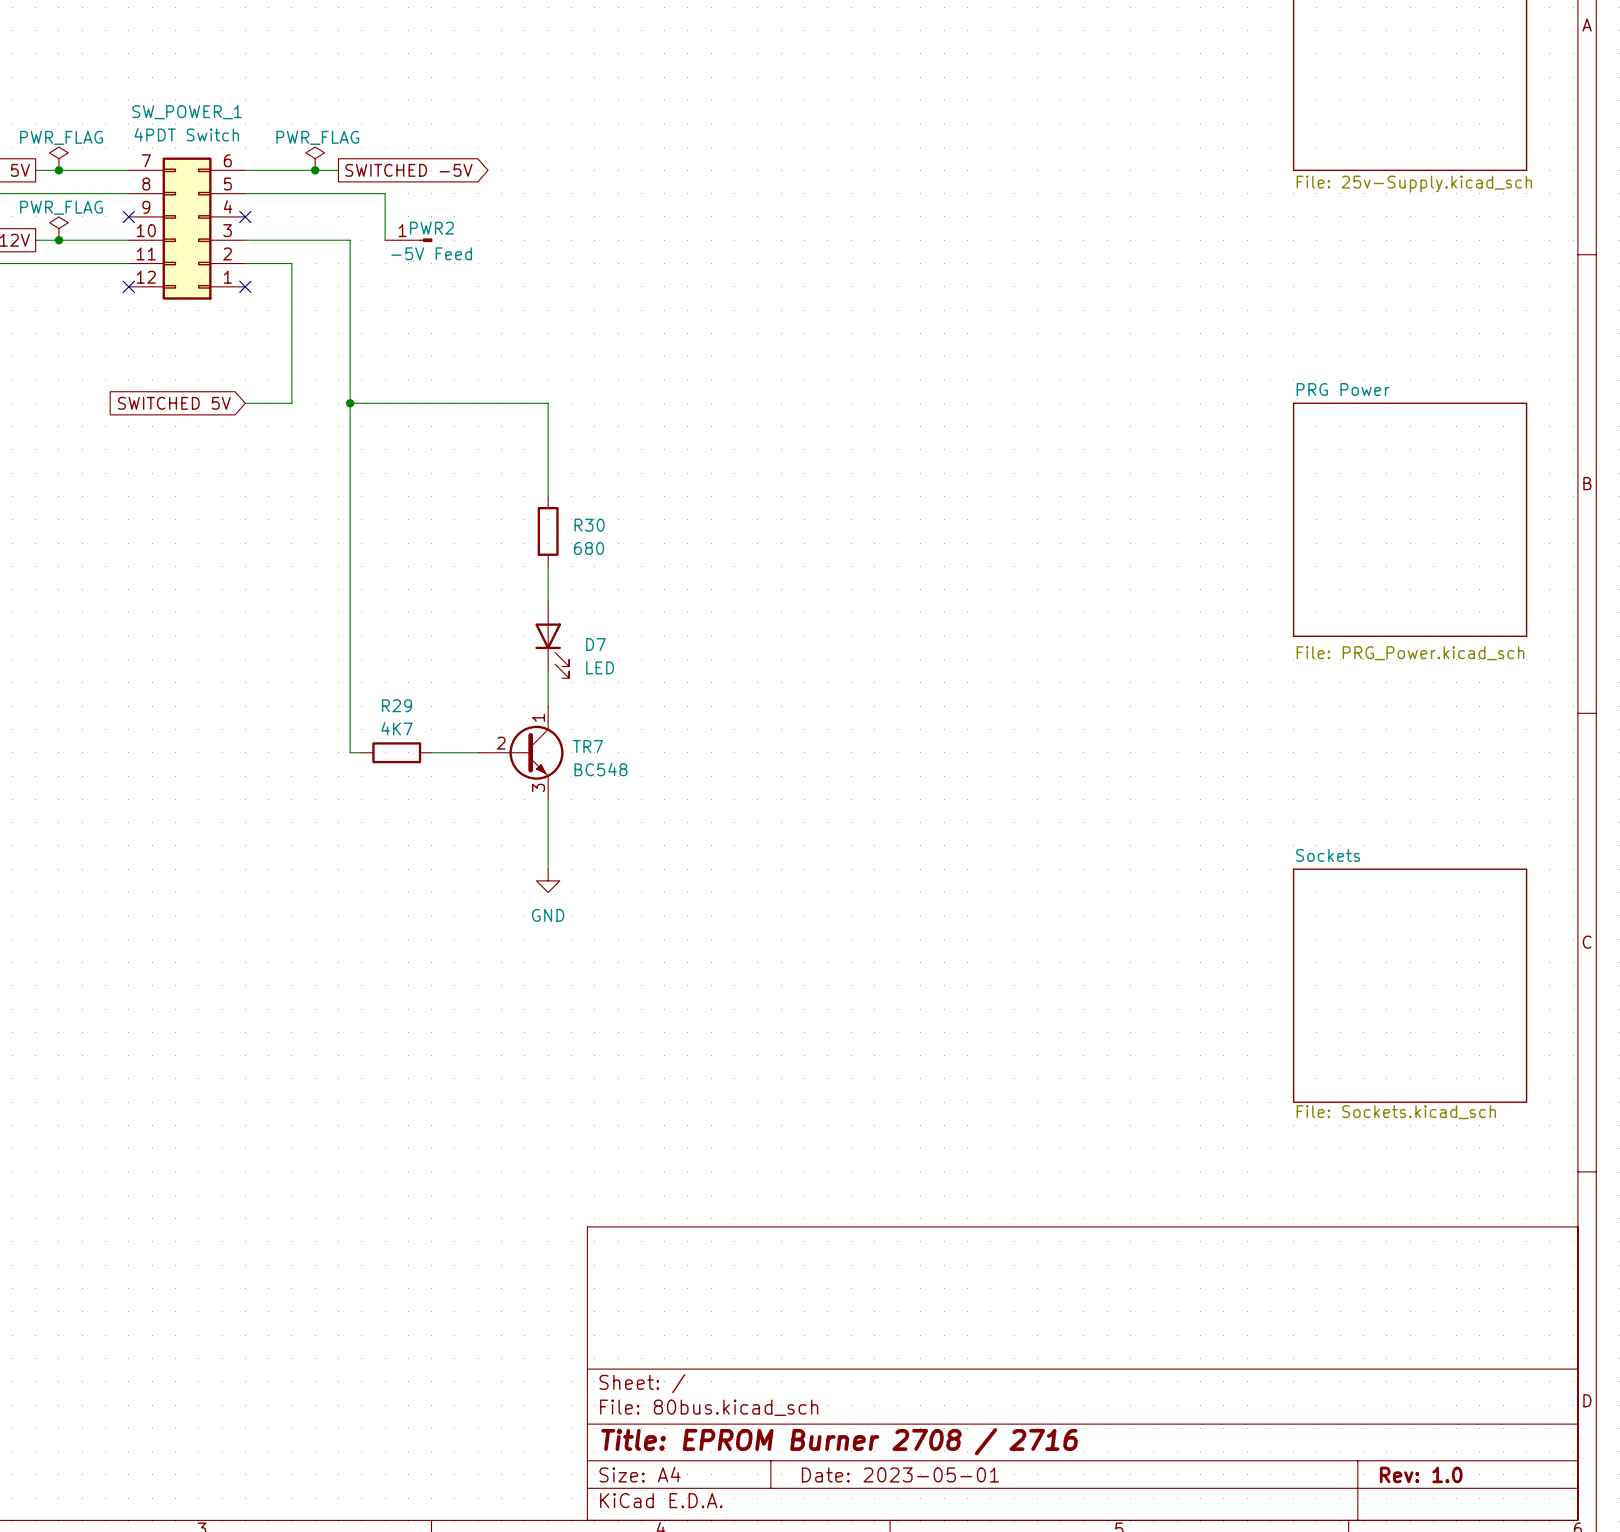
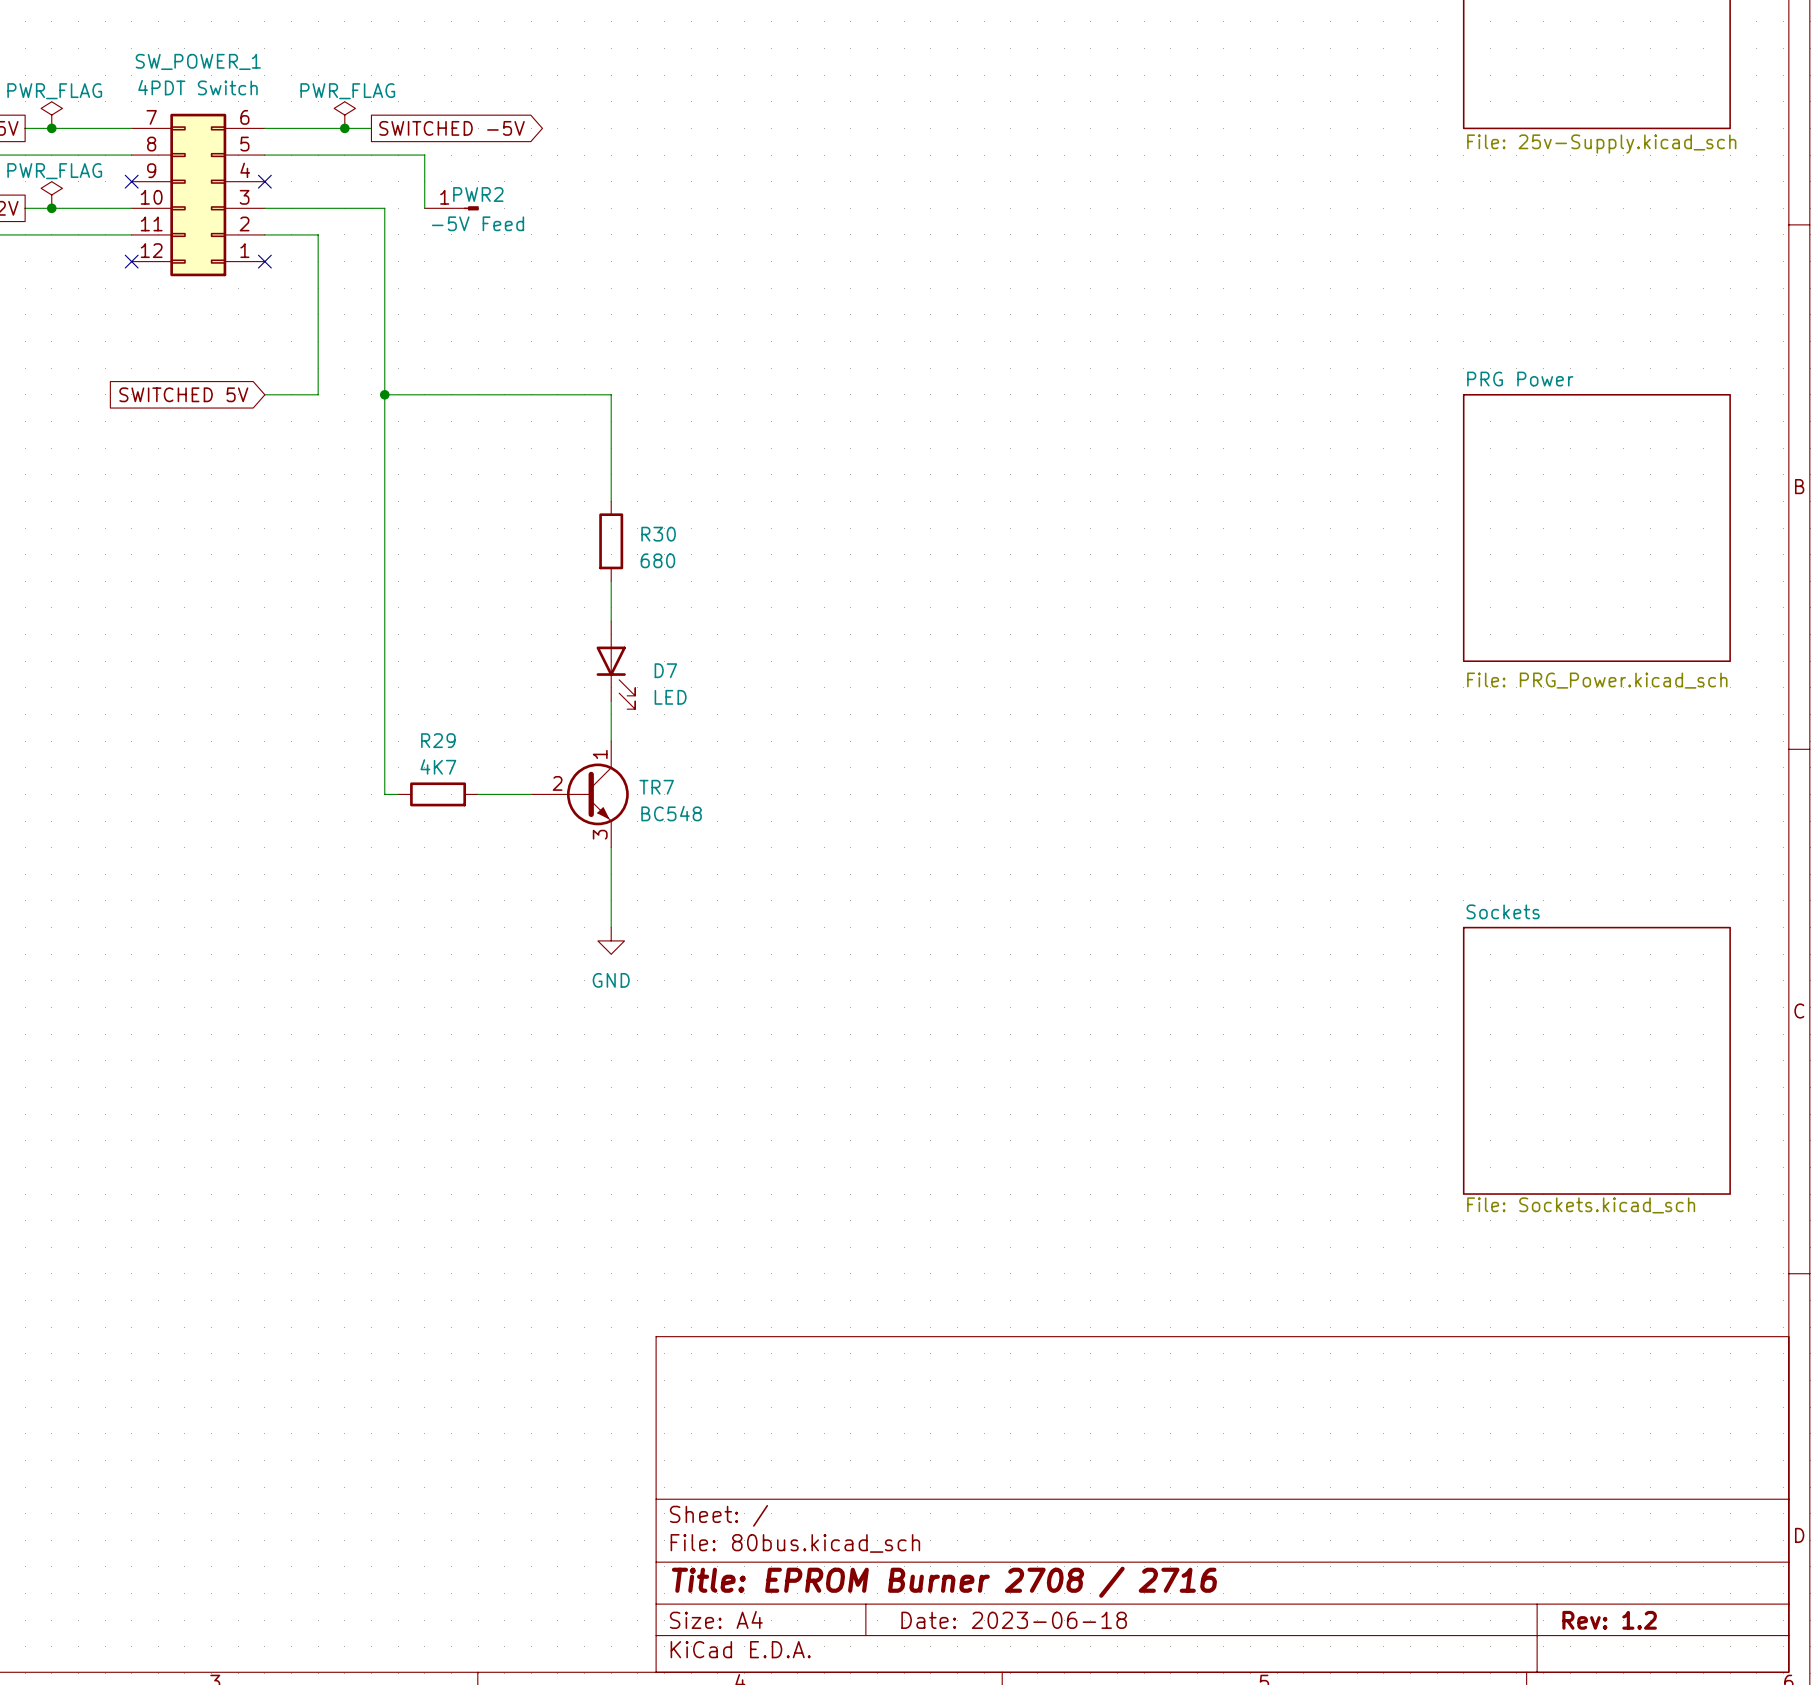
title block: Date: 2023-05-01 (900, 1474) -> Date: 2023-06-18 (1014, 1620)
title block: Rev: 1.0 (1421, 1474) -> Rev: 1.2 (1609, 1620)

